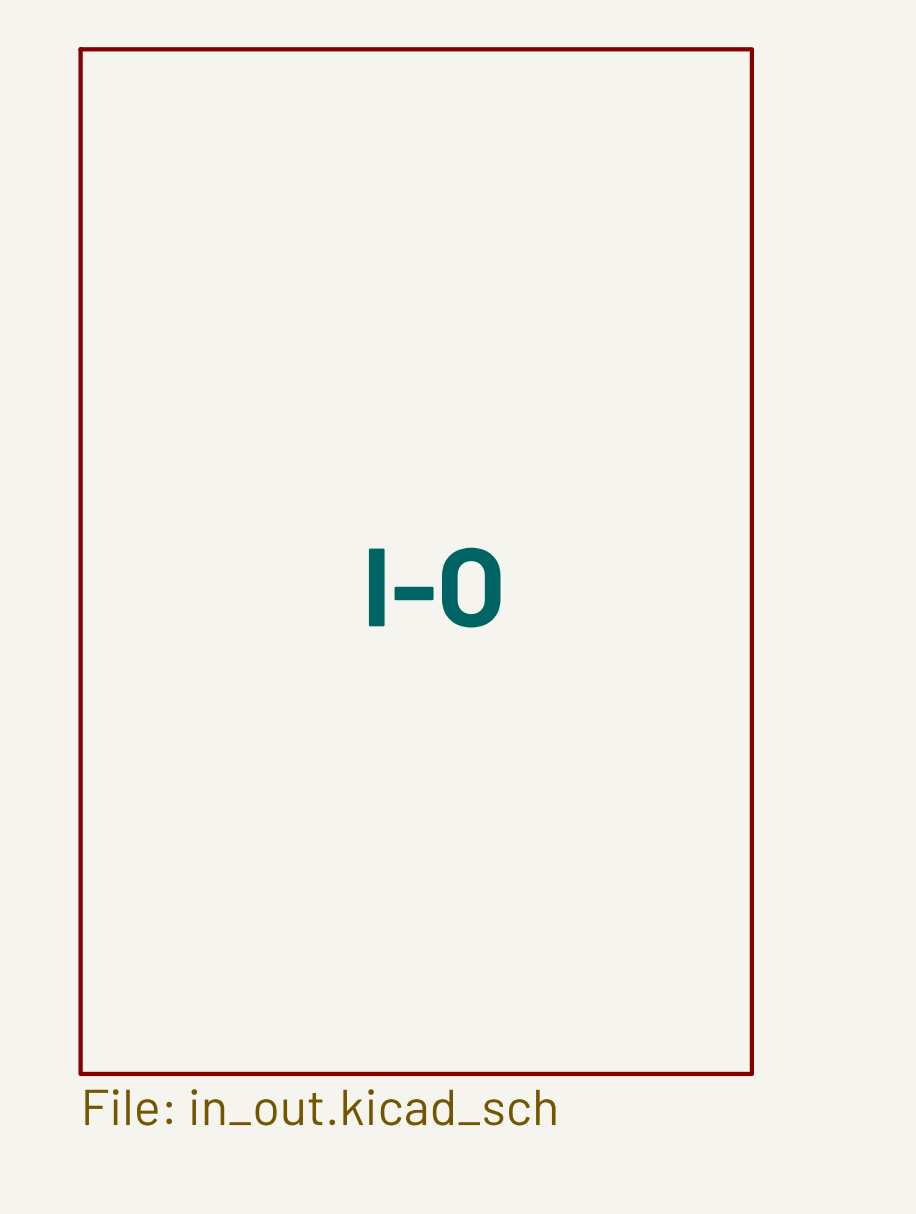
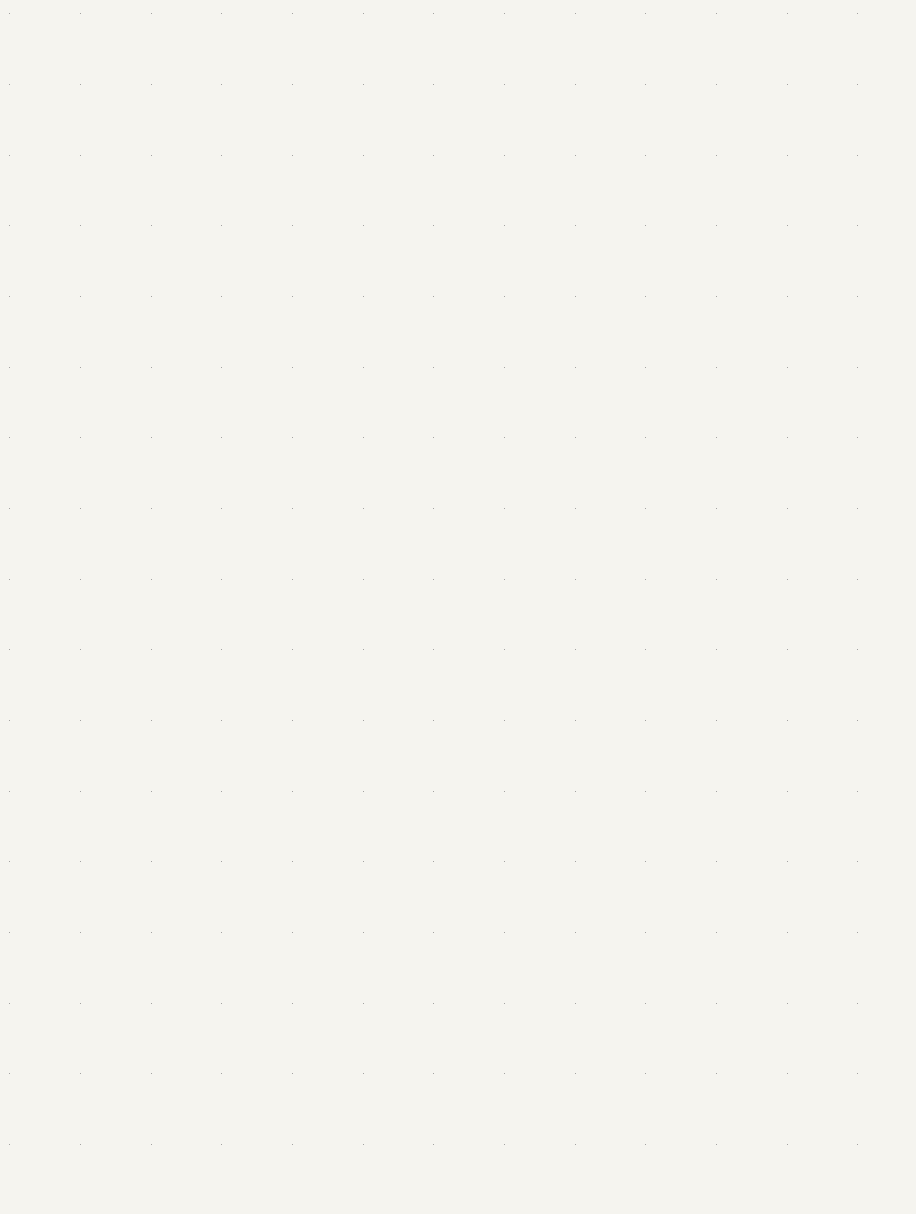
sheet I-O: File: in_out.kicad_sch (416, 561) -> none

